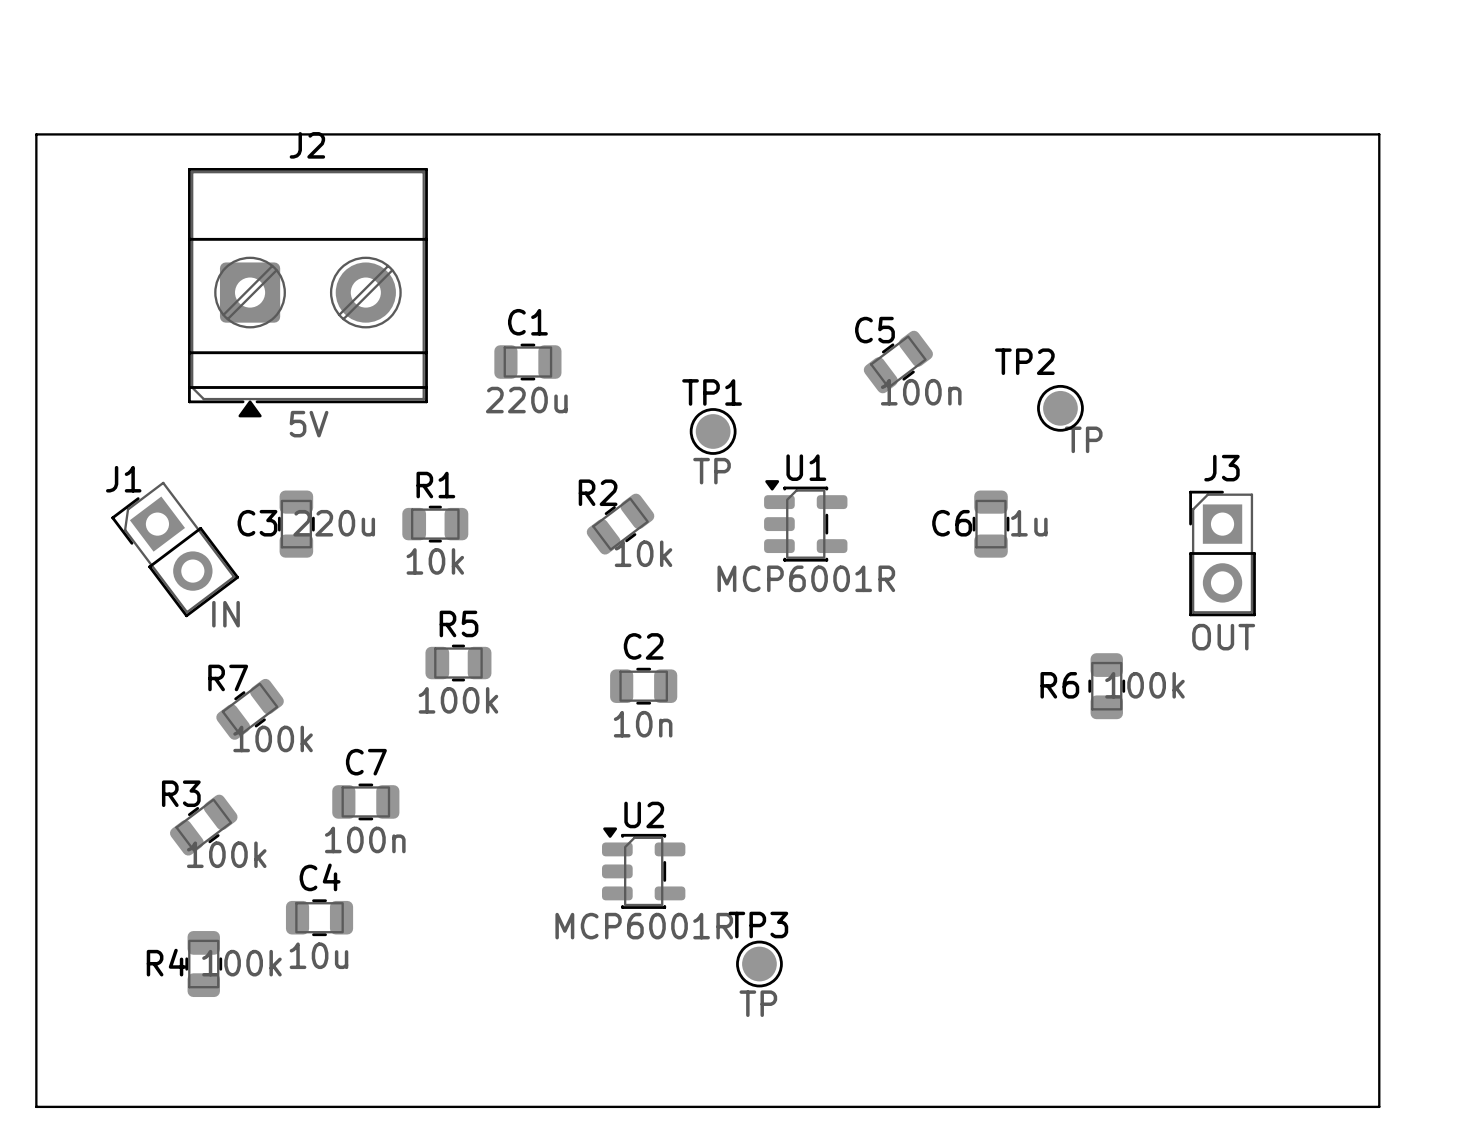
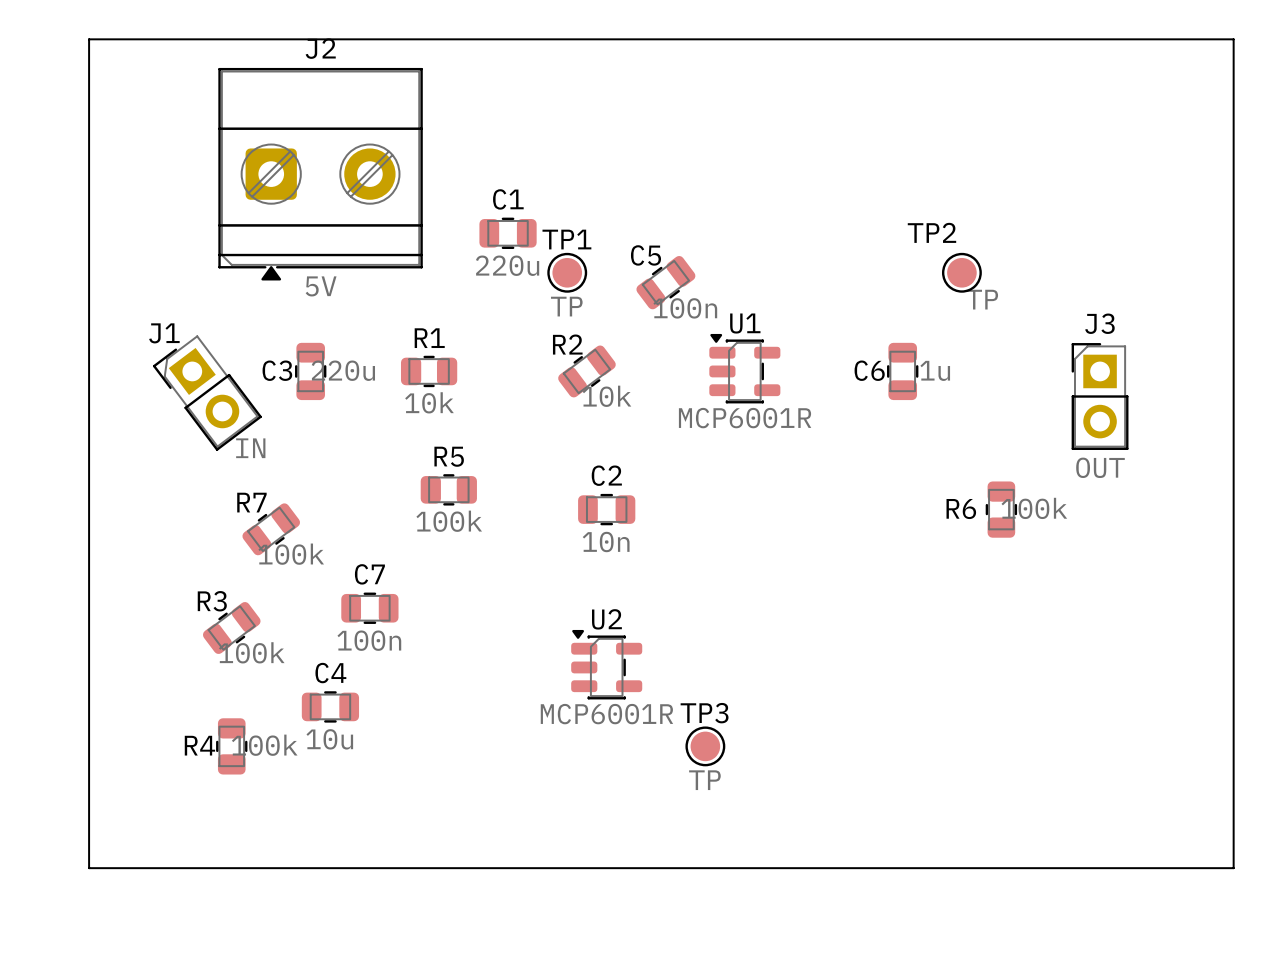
C5 position: (898, 362) -> (665, 282)
TP1 position: (713, 431) -> (567, 272)

